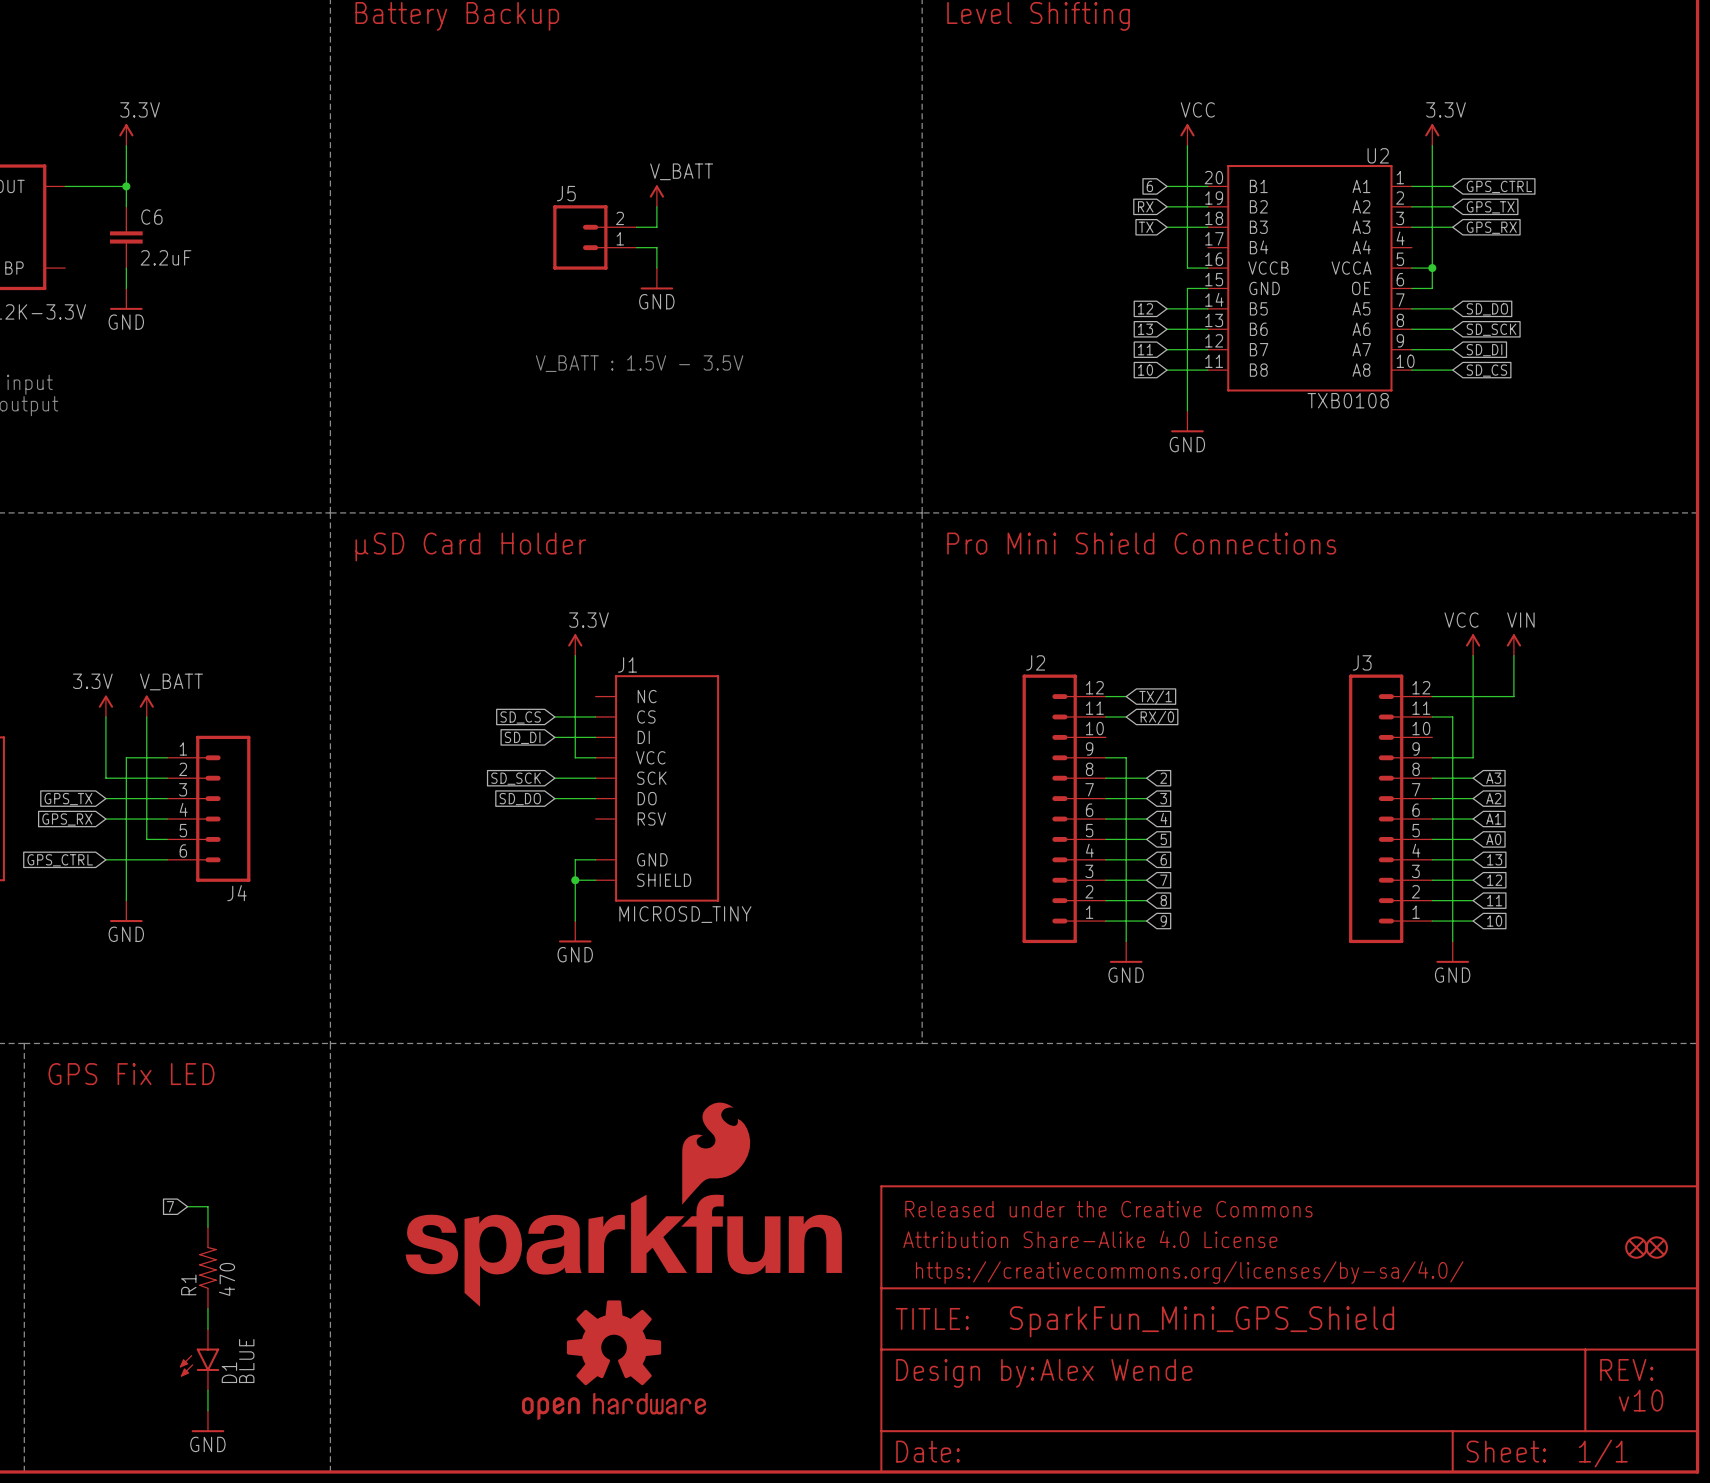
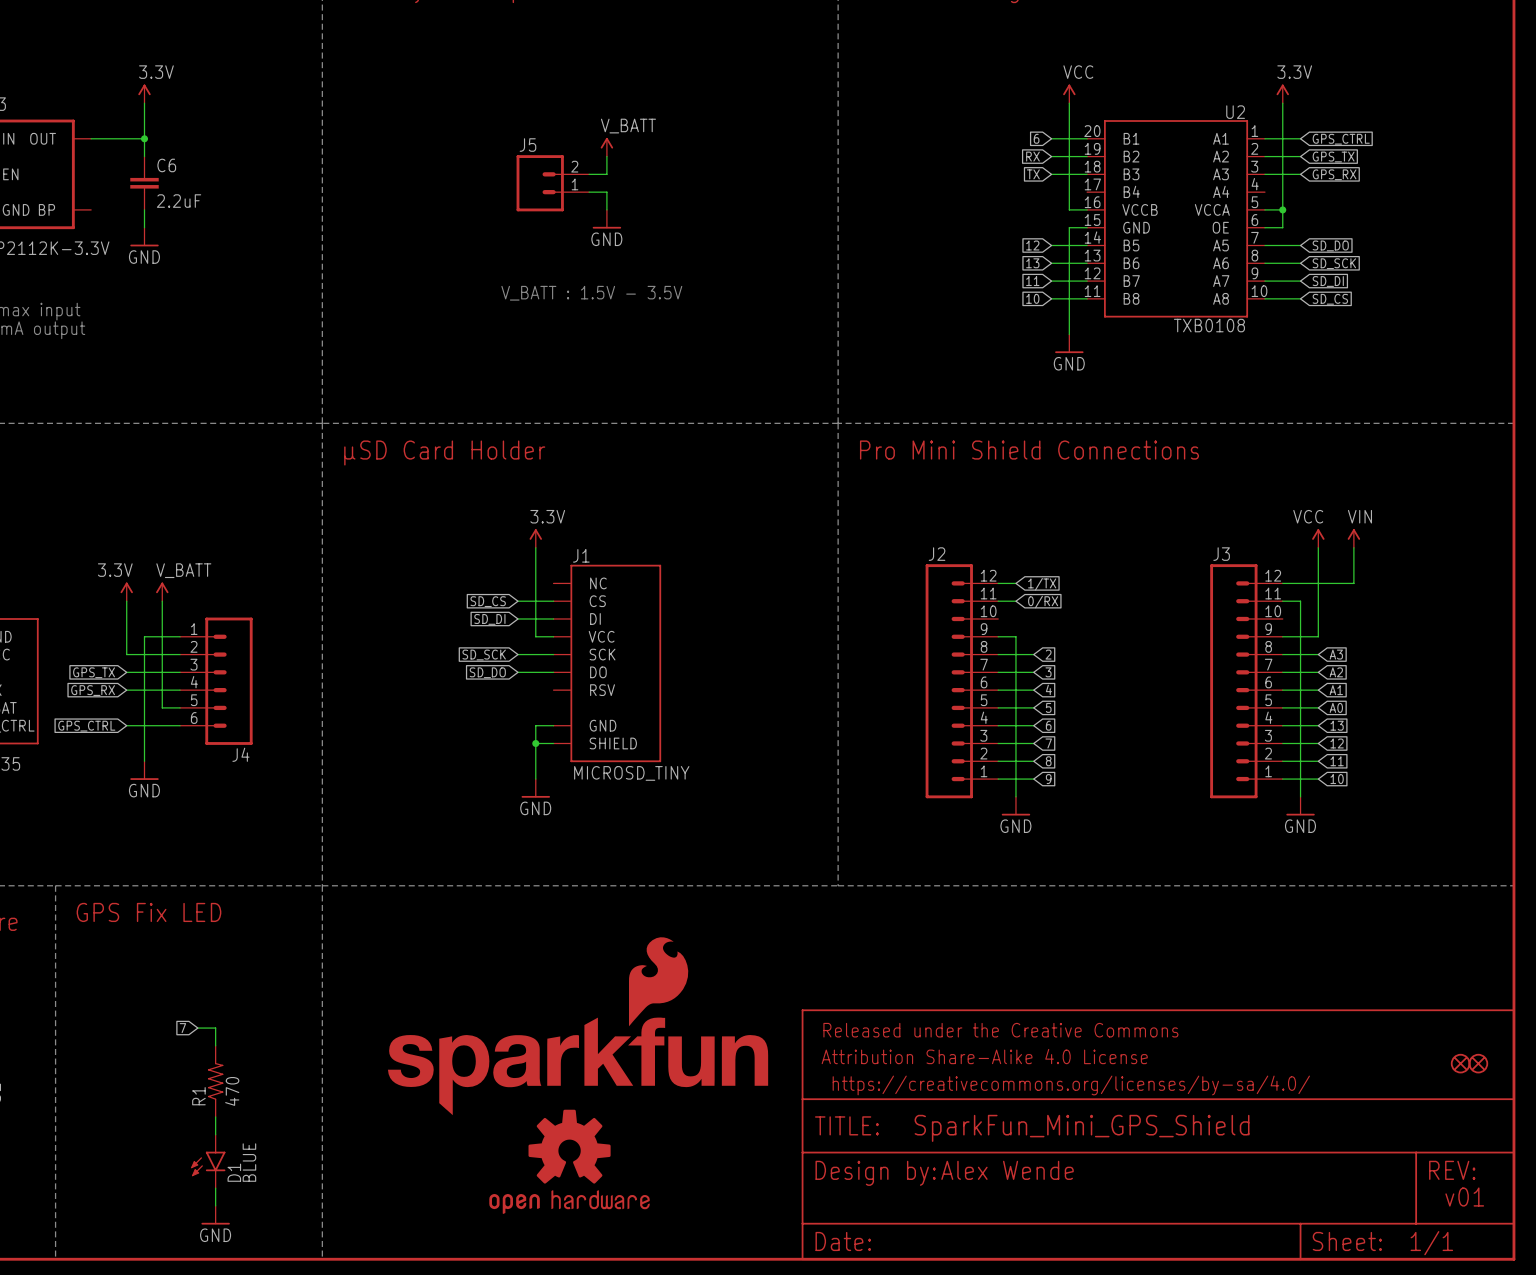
global label: TX/1 (1155, 697) -> 1/TX (1042, 584)
global label: RX/0 (1157, 717) -> 0/RX (1043, 602)
text: v10 (1641, 1400) -> v01 (1464, 1197)

